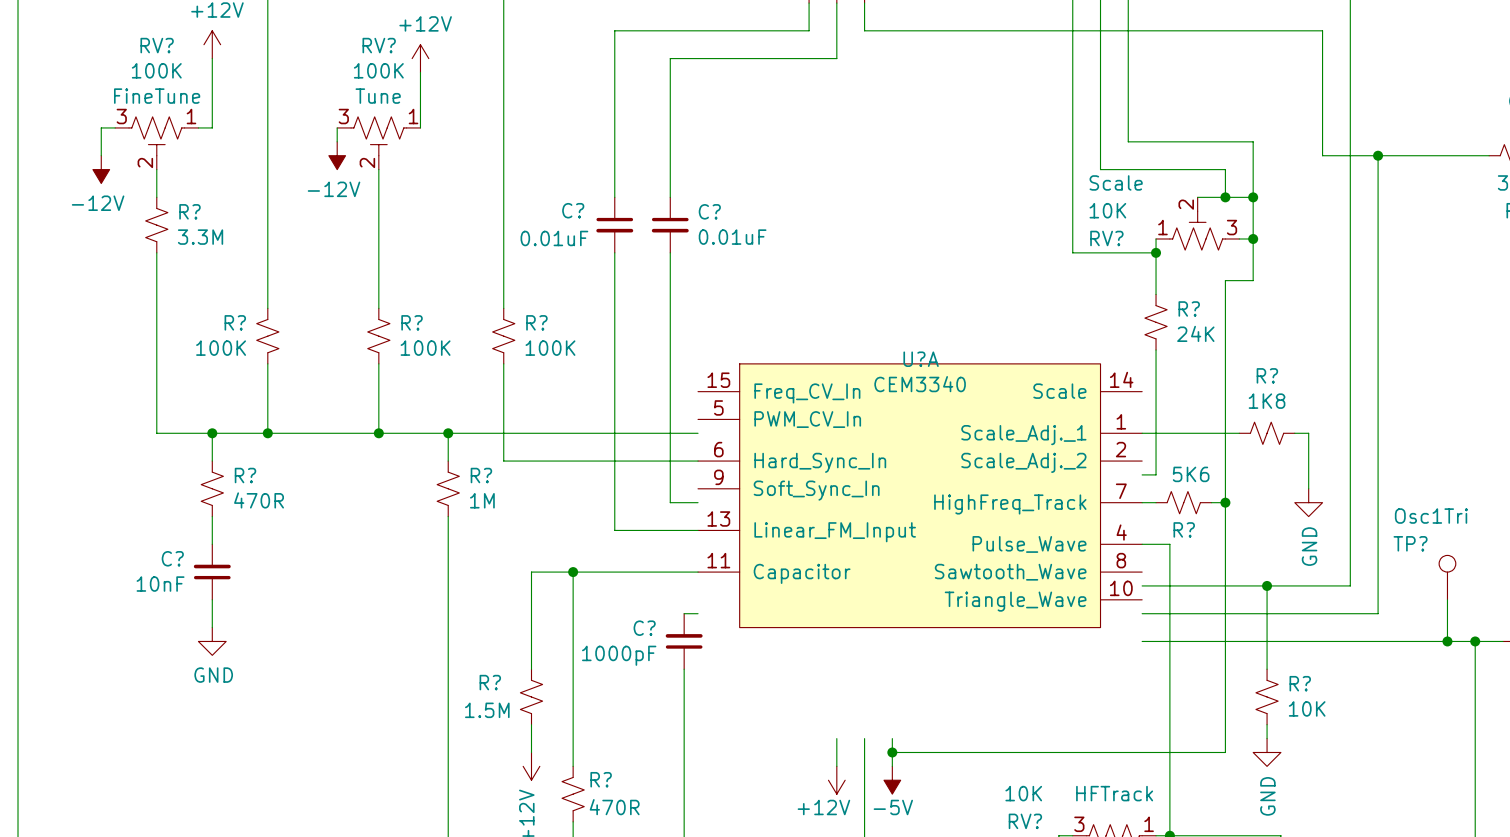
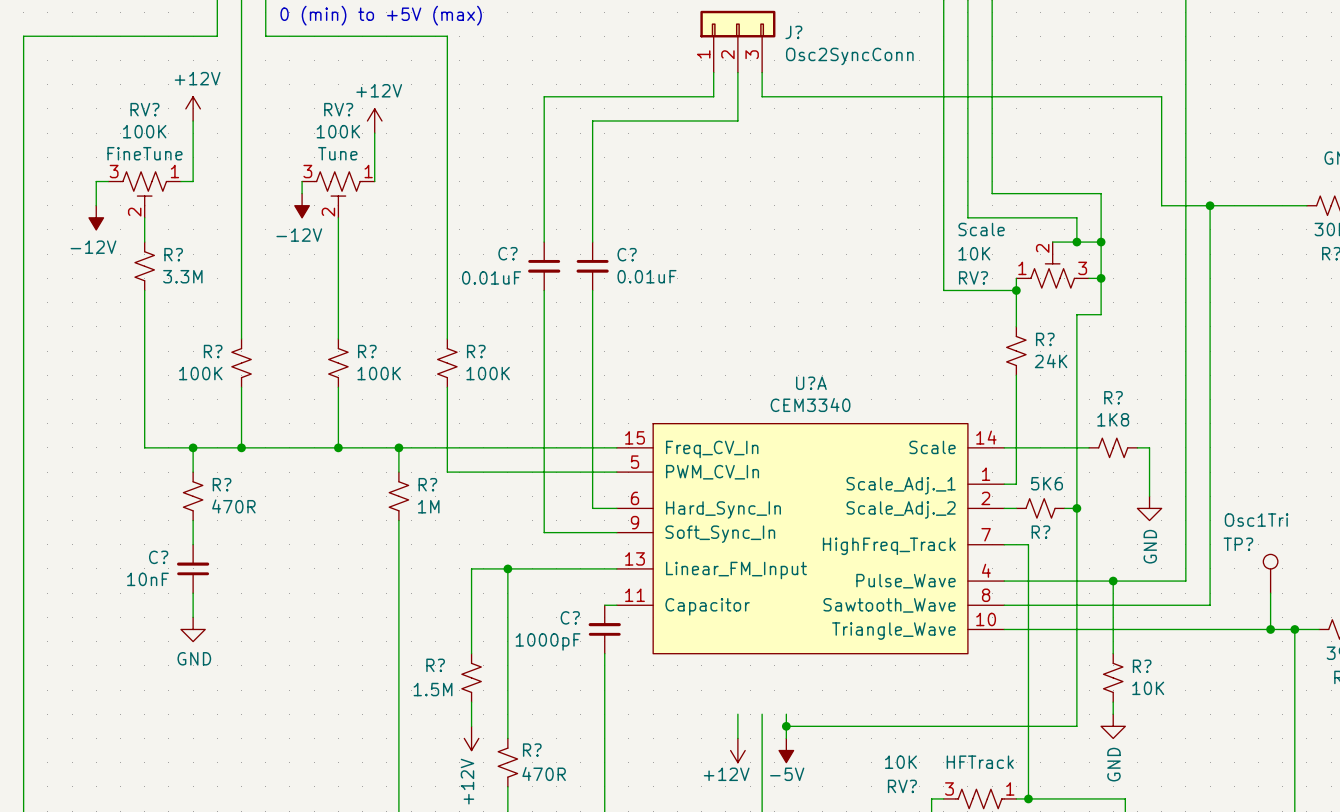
U?A position: (920, 391) -> (810, 447)

